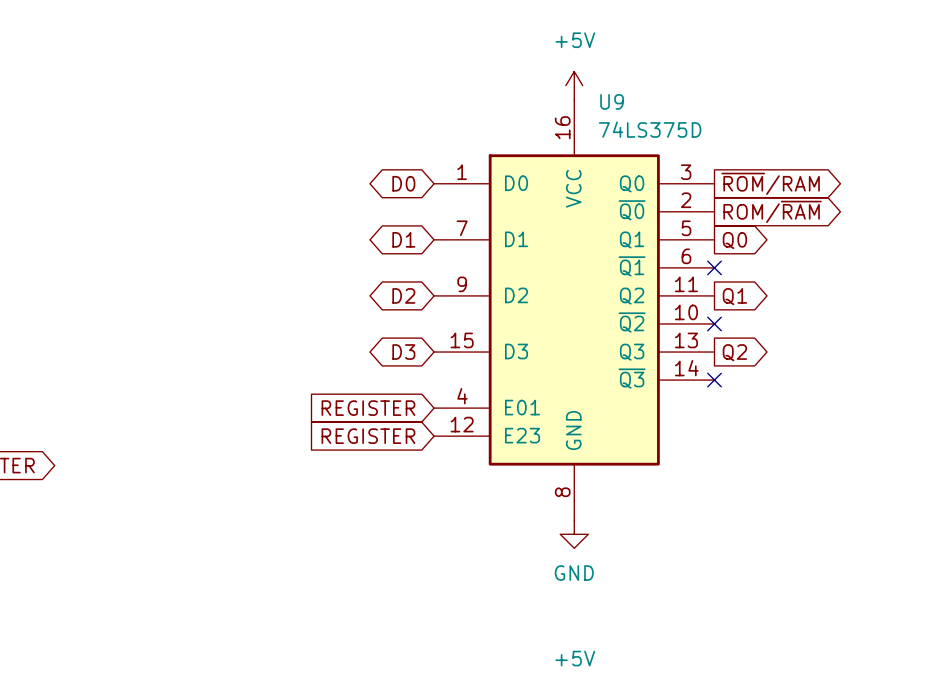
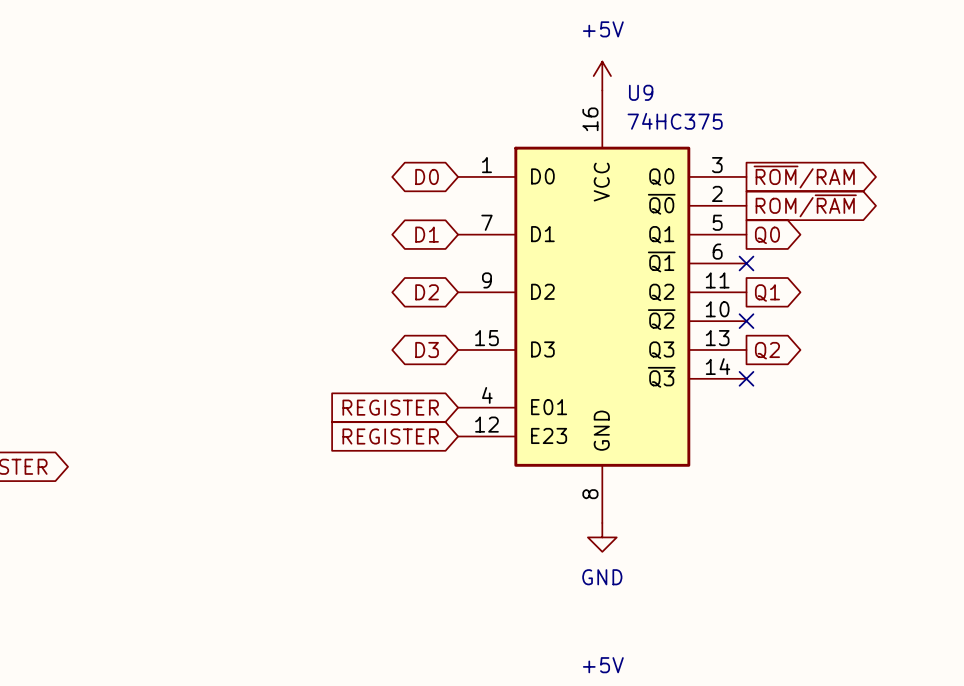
U9 value: 74LS375D (650, 129) -> 74HC375 (675, 121)

